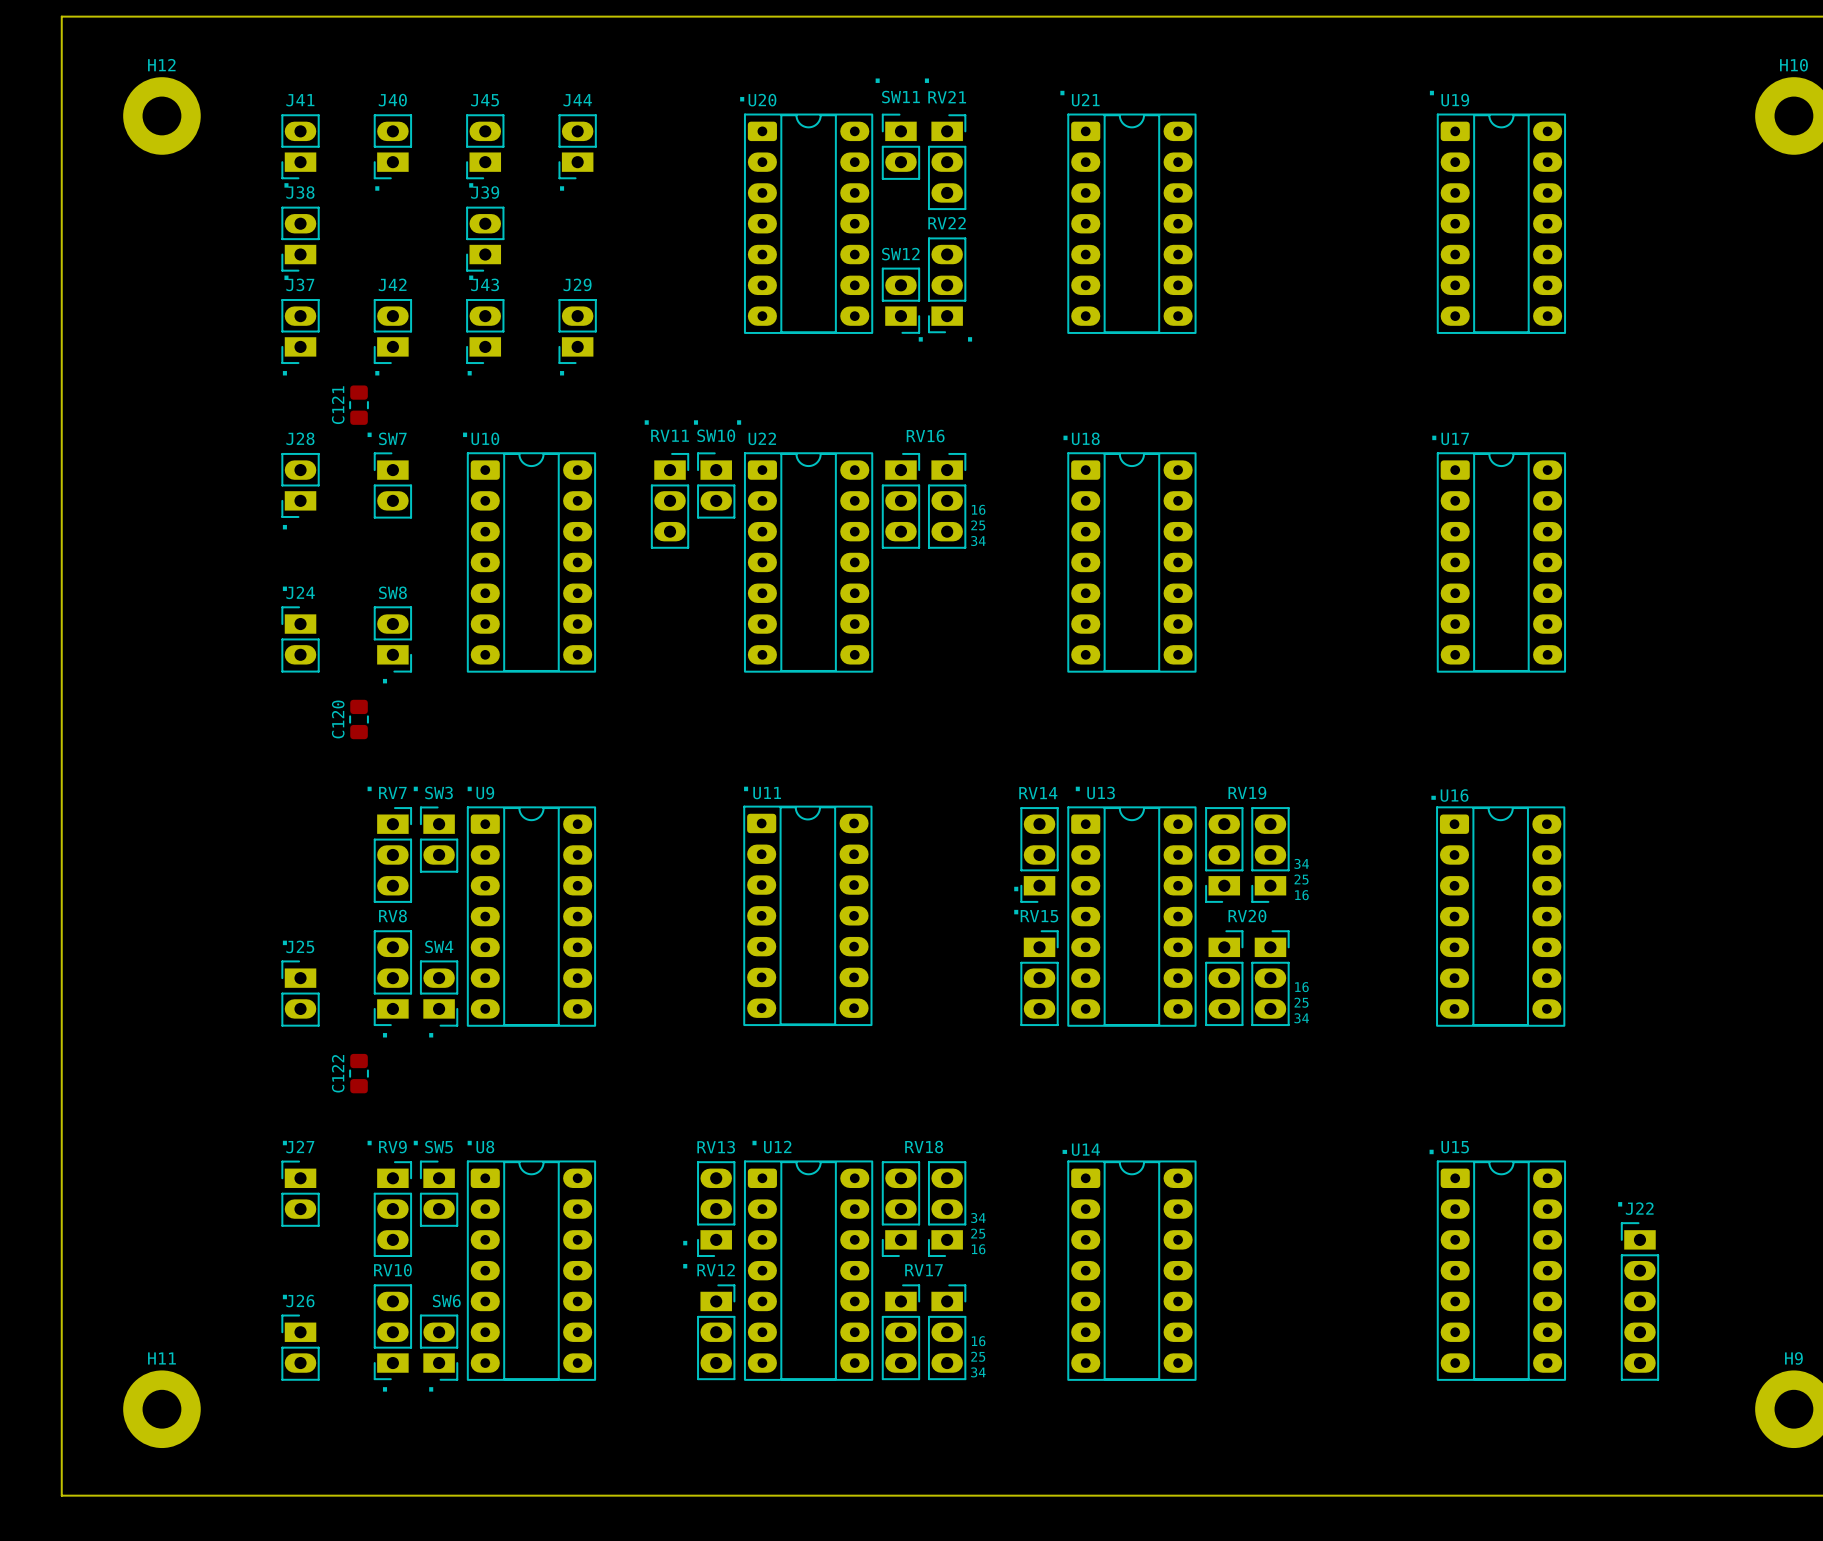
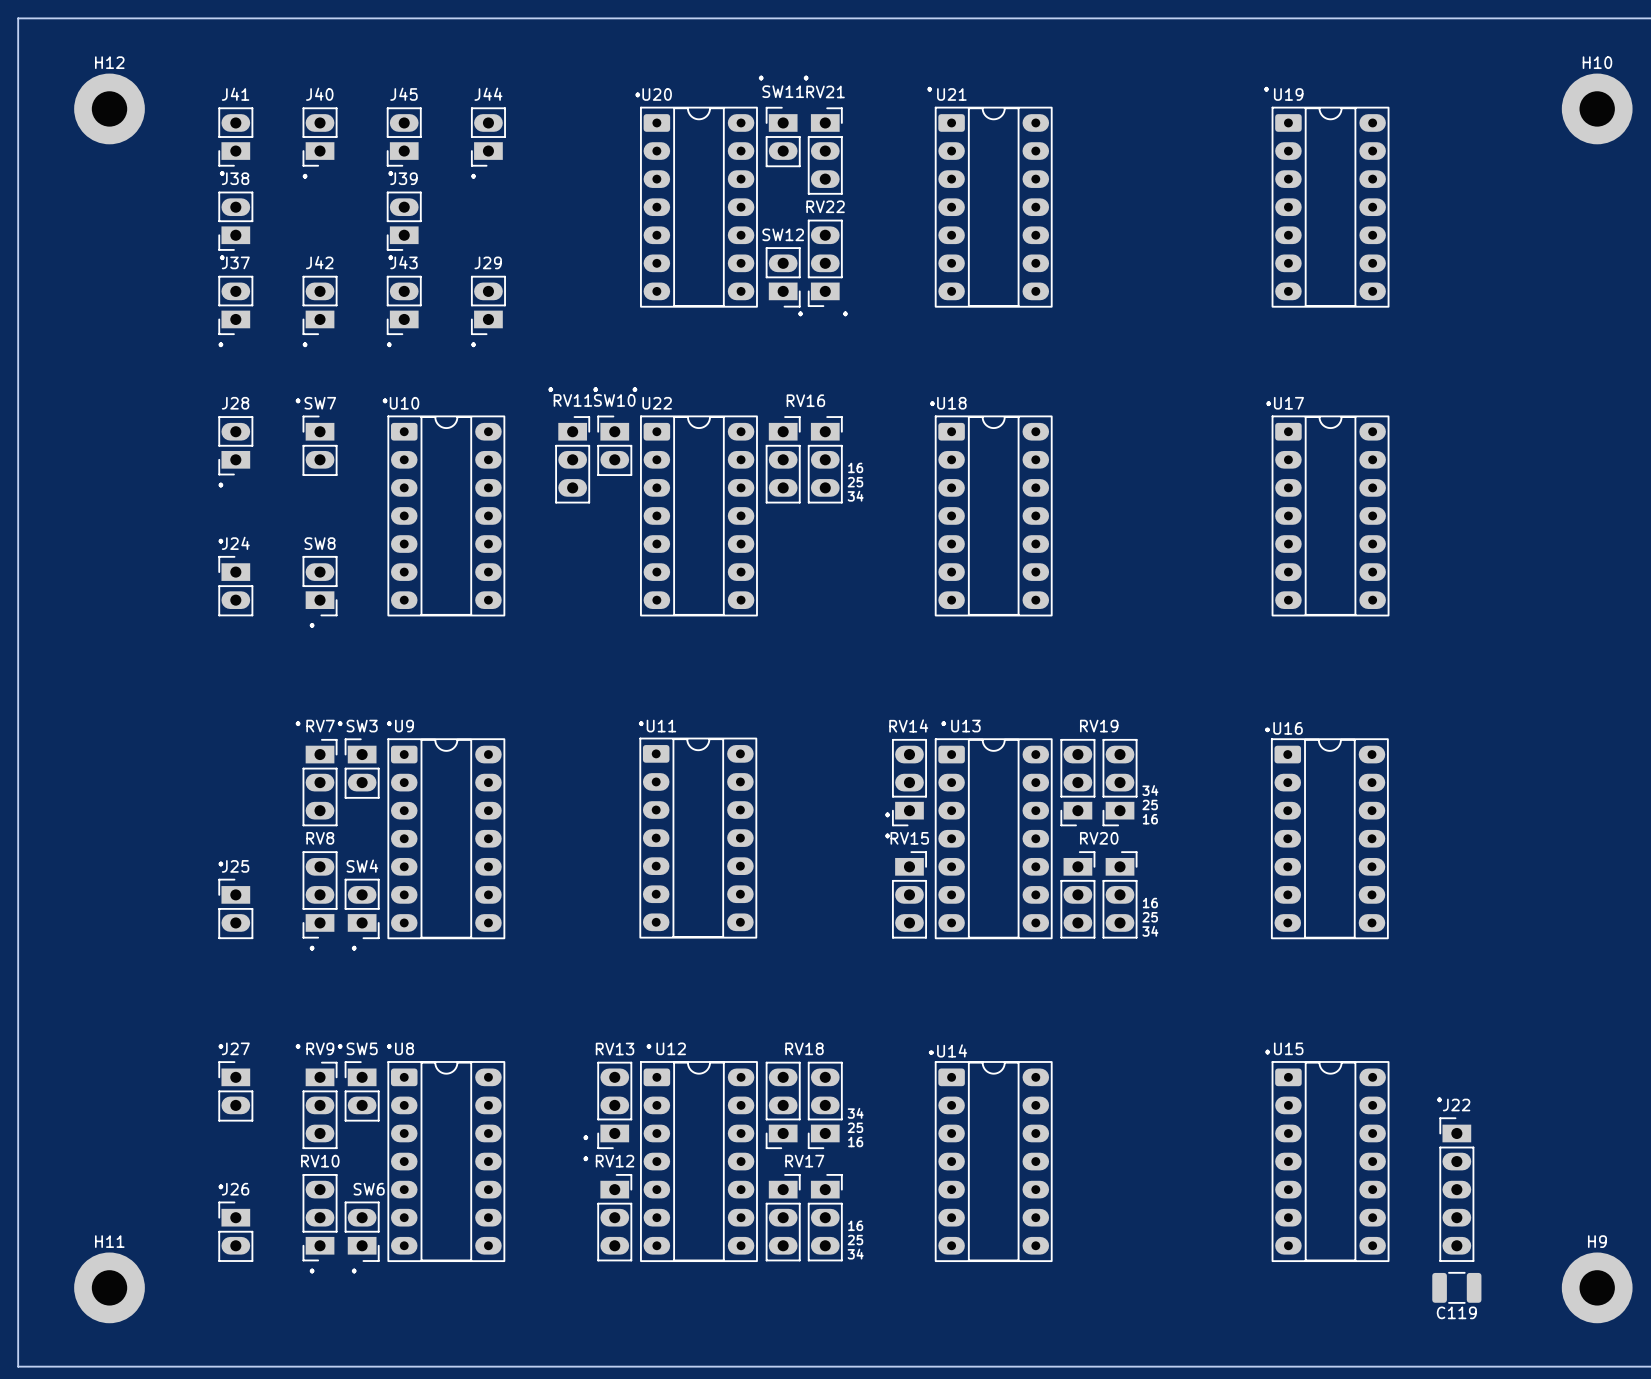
C121: (359, 405) -> none
C120: (359, 719) -> none
C122: (359, 1073) -> none
C119: none -> (1456, 1287)

